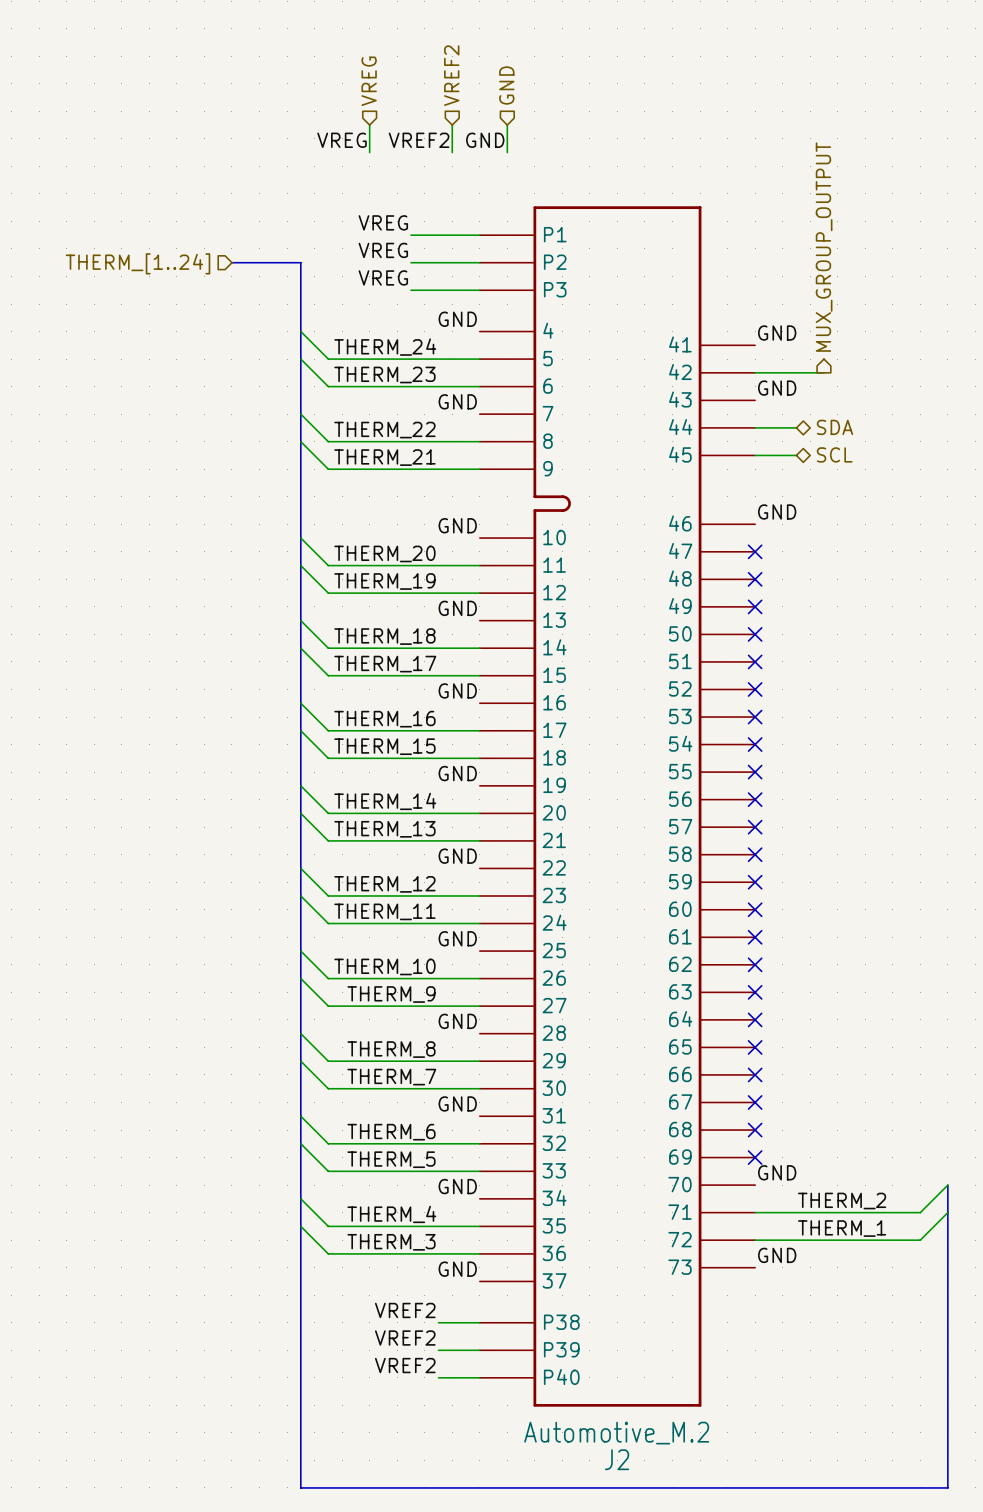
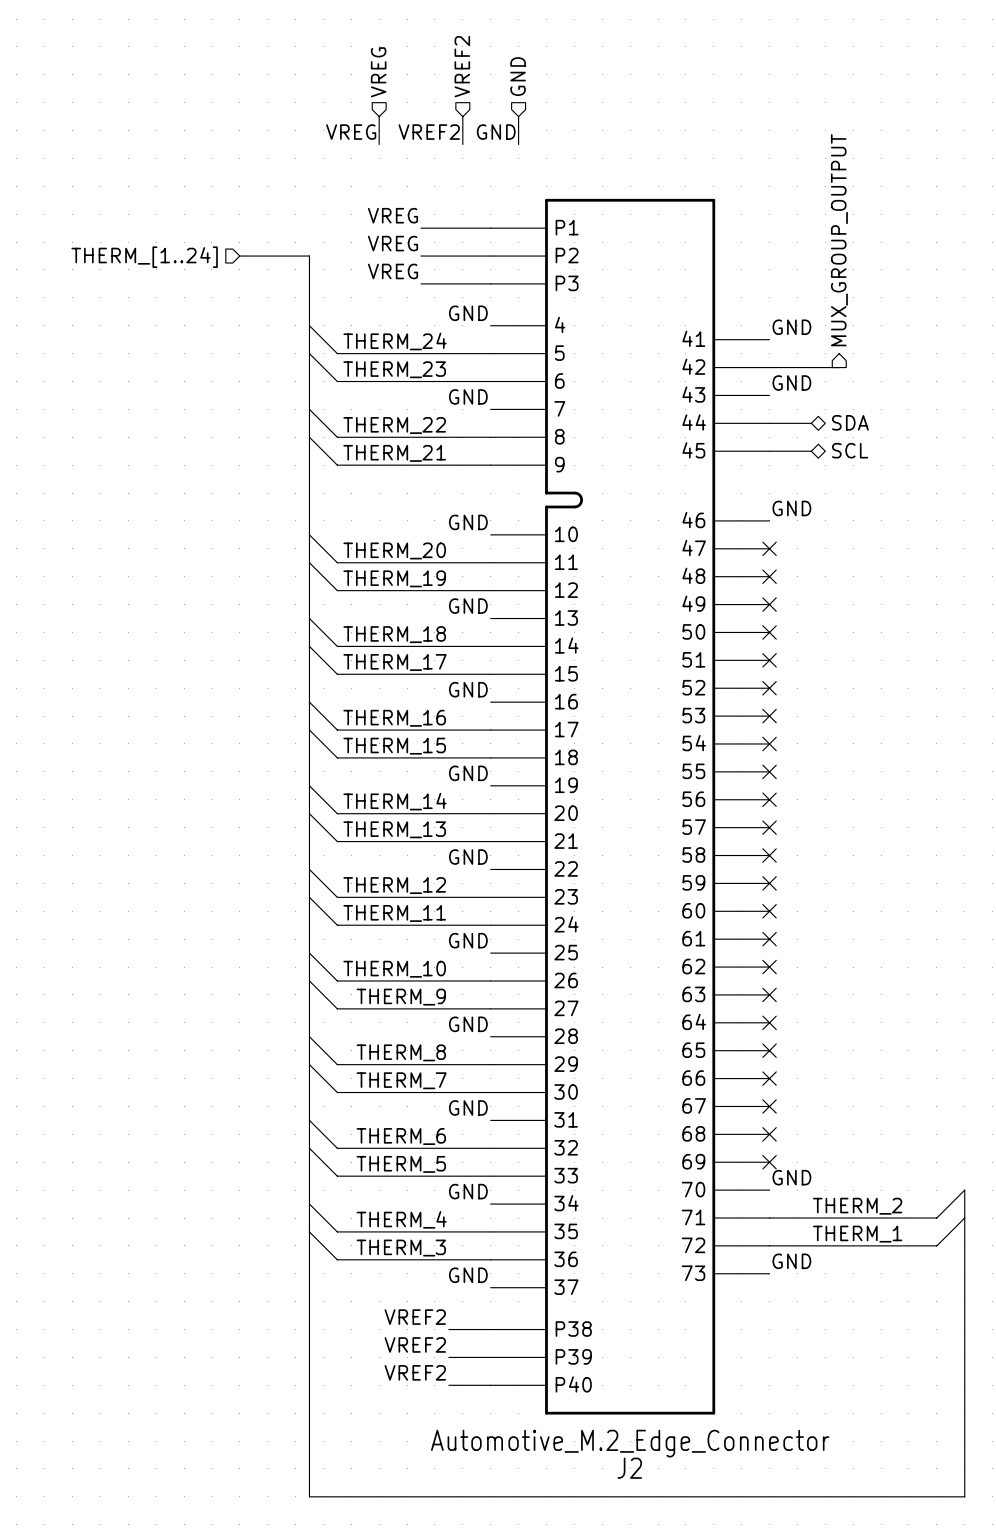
J2 value: Automotive_M.2 (616, 1433) -> Automotive_M.2_Edge_Connector (630, 1443)

